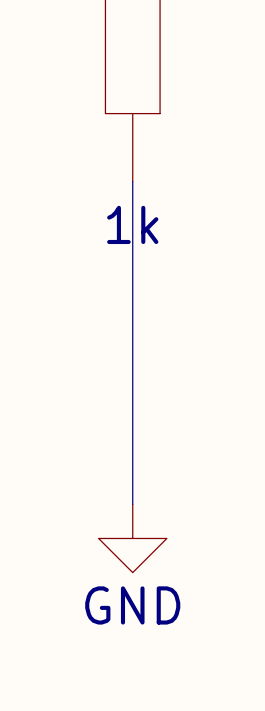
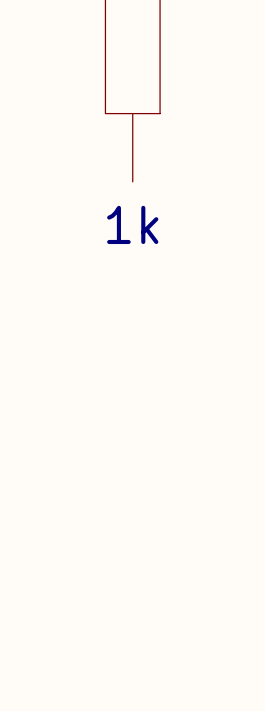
wire: (132, 181) (132, 504) -> none
power symbol: GND (132, 538) -> none

